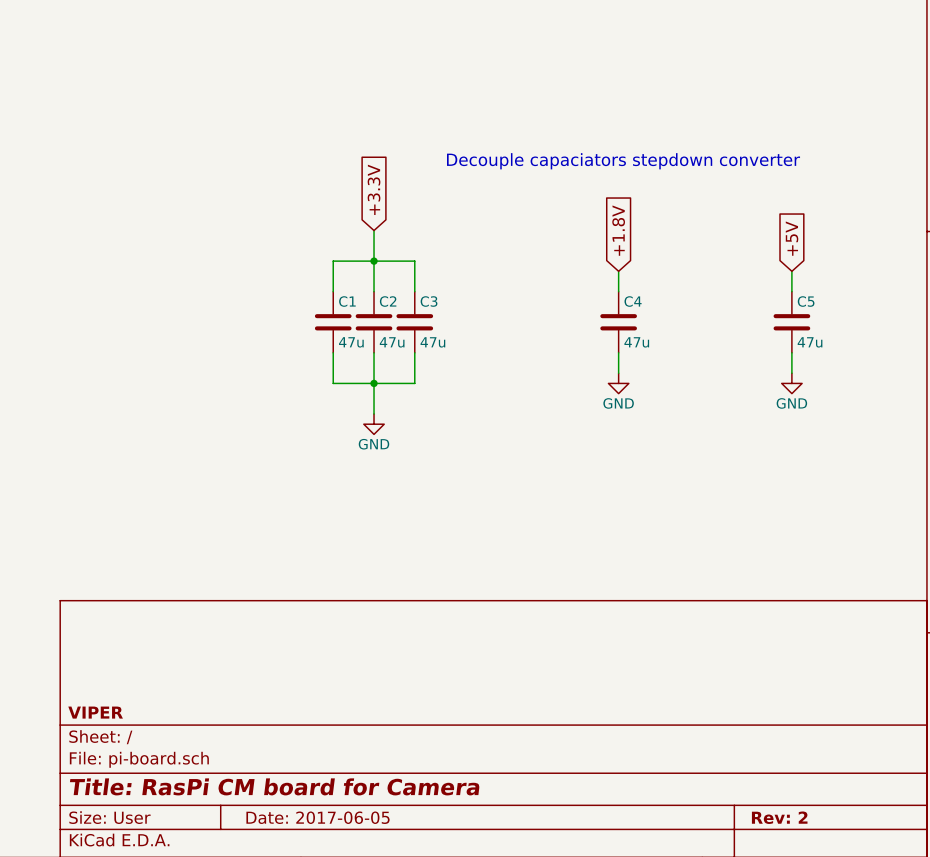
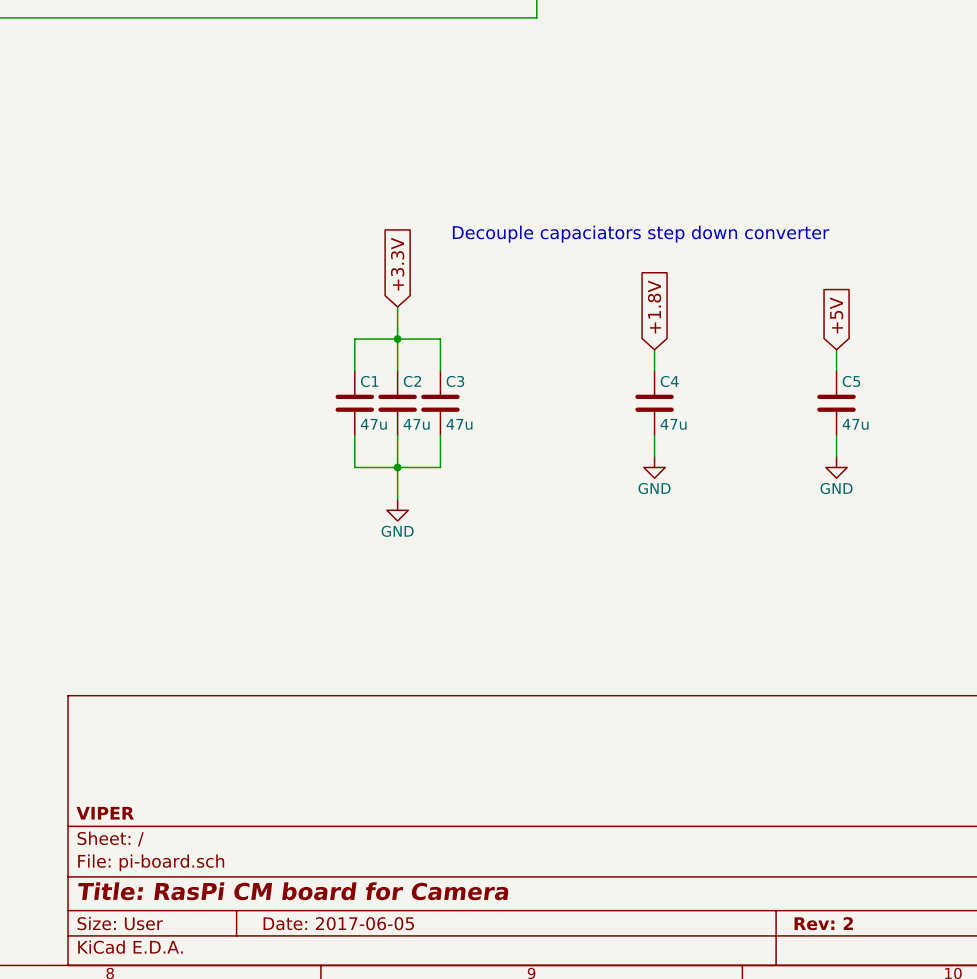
text: Decouple capaciators stepdown converter (623, 161) -> Decouple capaciators step down converter (641, 234)

